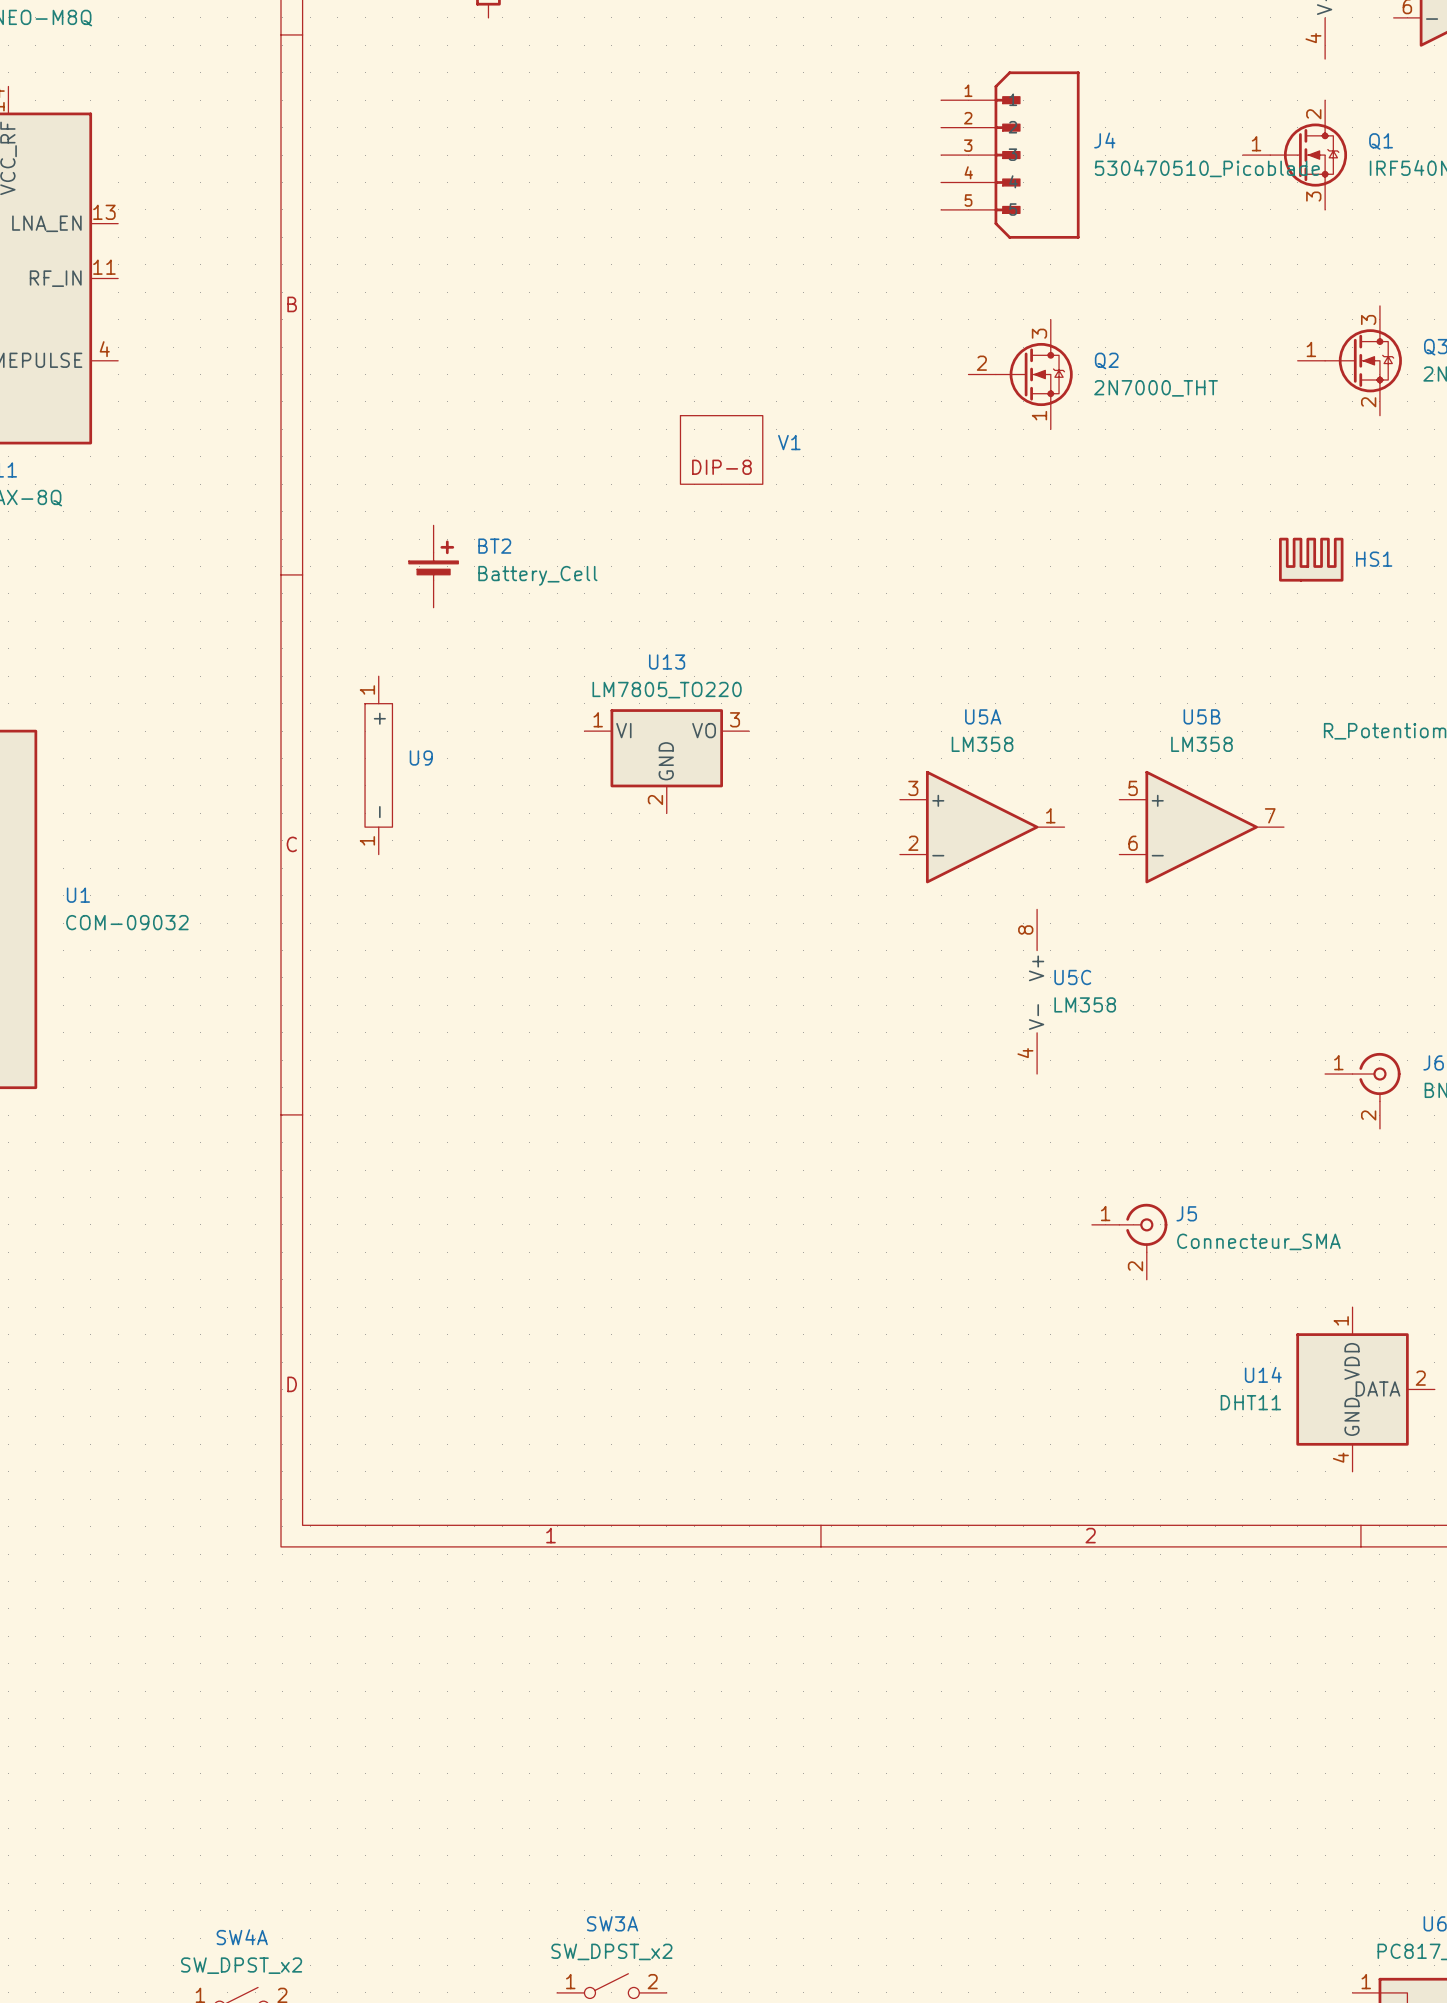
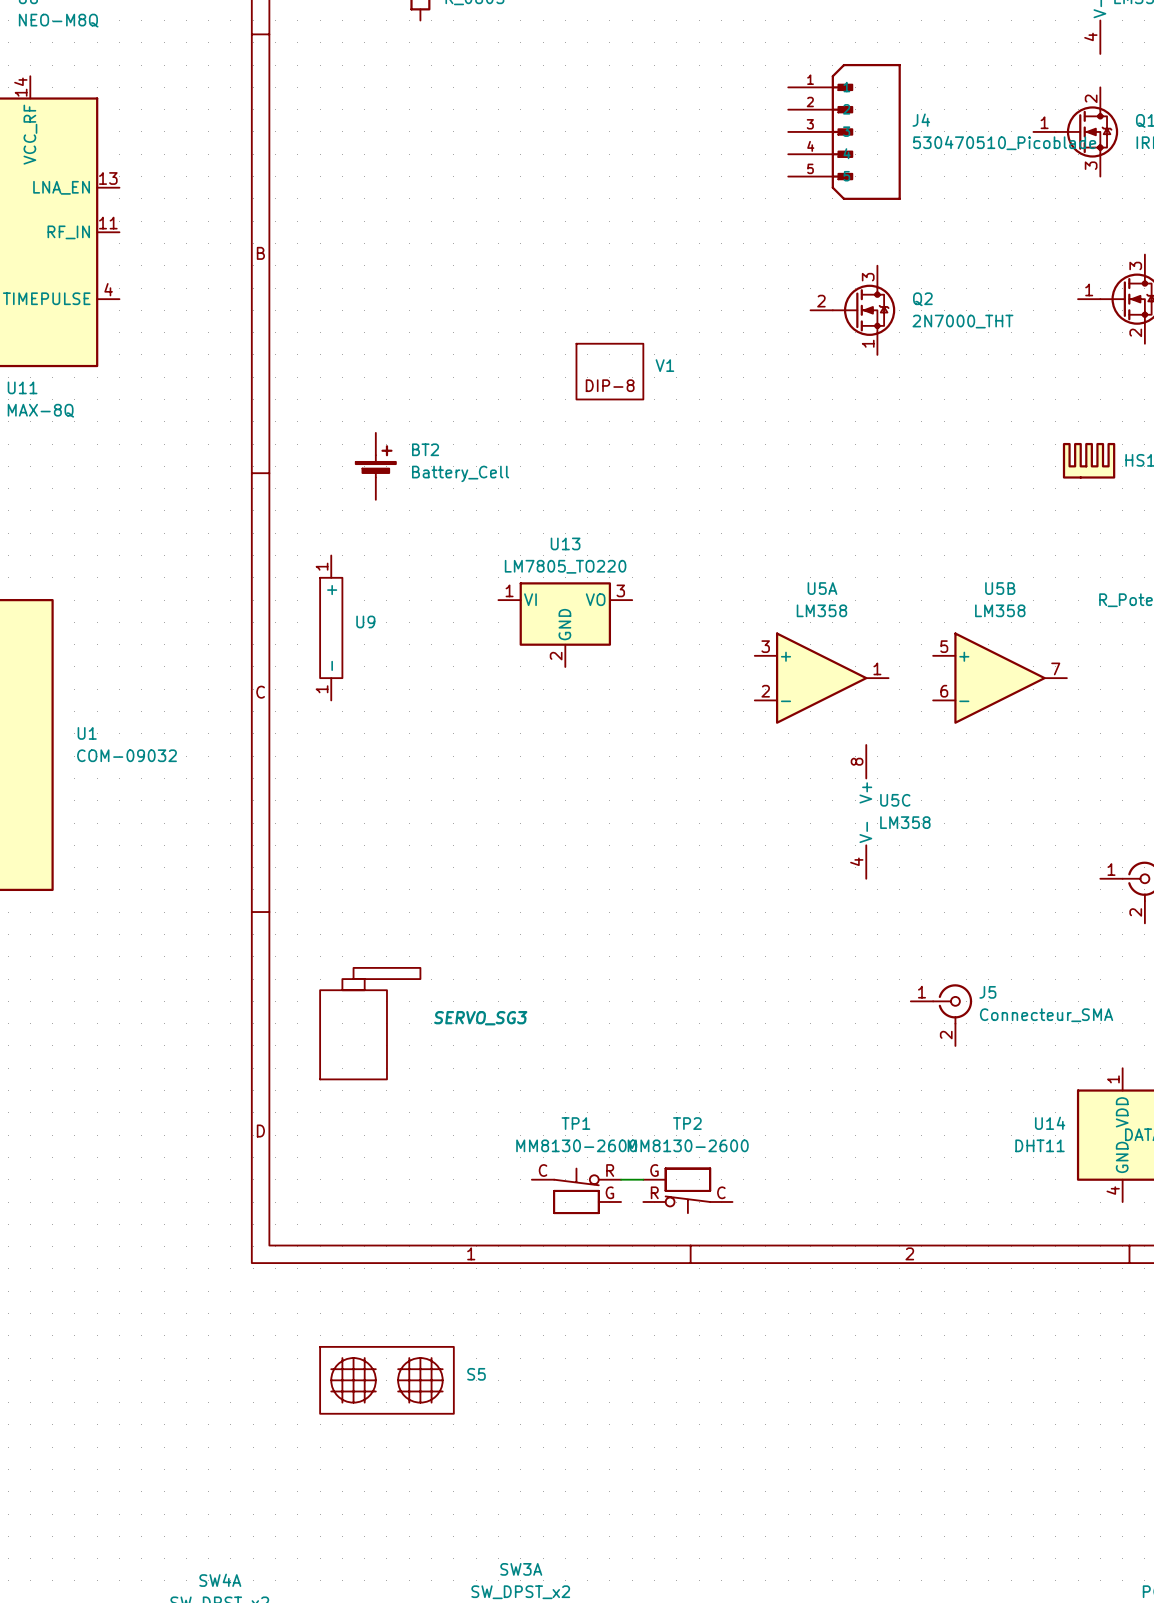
SERVO_SG3: none -> (370, 1023)
wire: none -> (621, 1179) (643, 1179)
TP1: none -> MM8130-2600 (576, 1190)
TP2: none -> MM8130-2600 (687, 1190)
S5: none -> (386, 1380)

